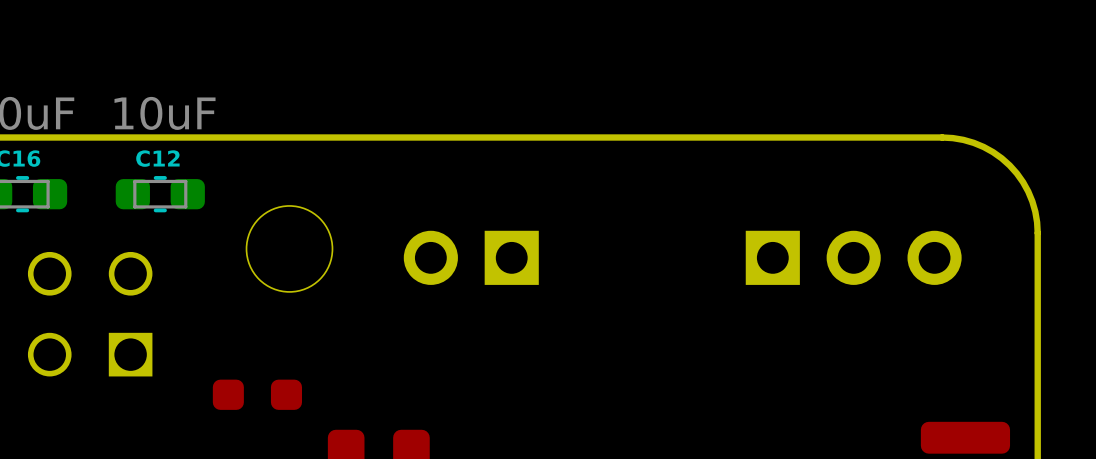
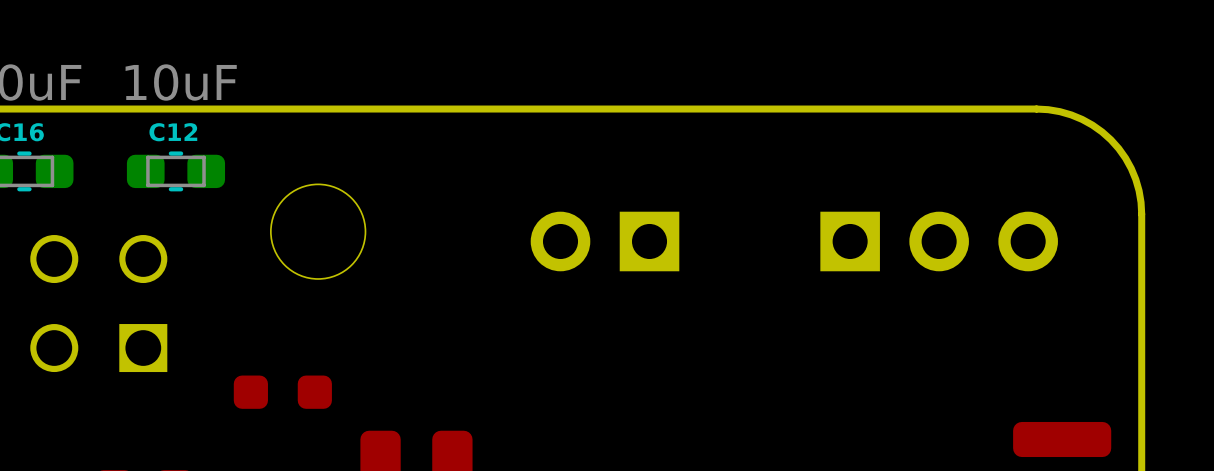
part position: (471, 257) -> (605, 241)

